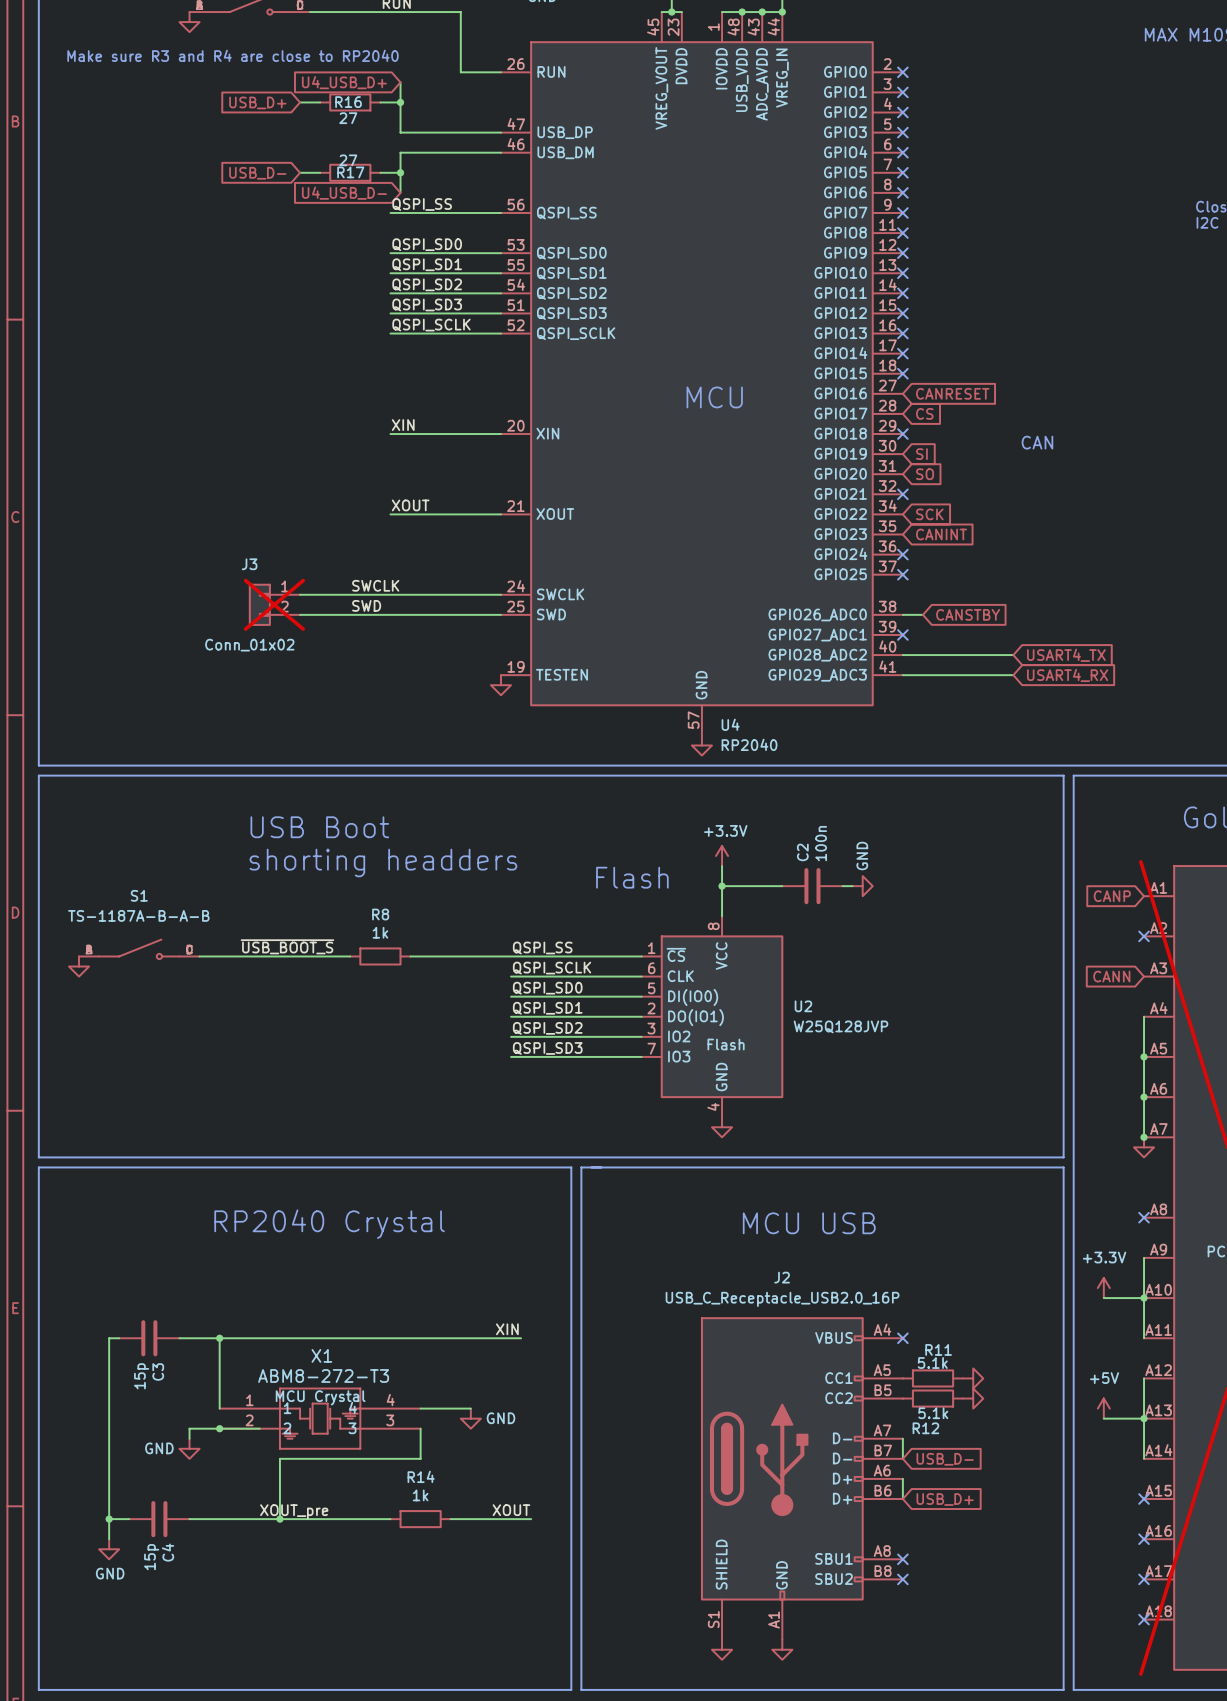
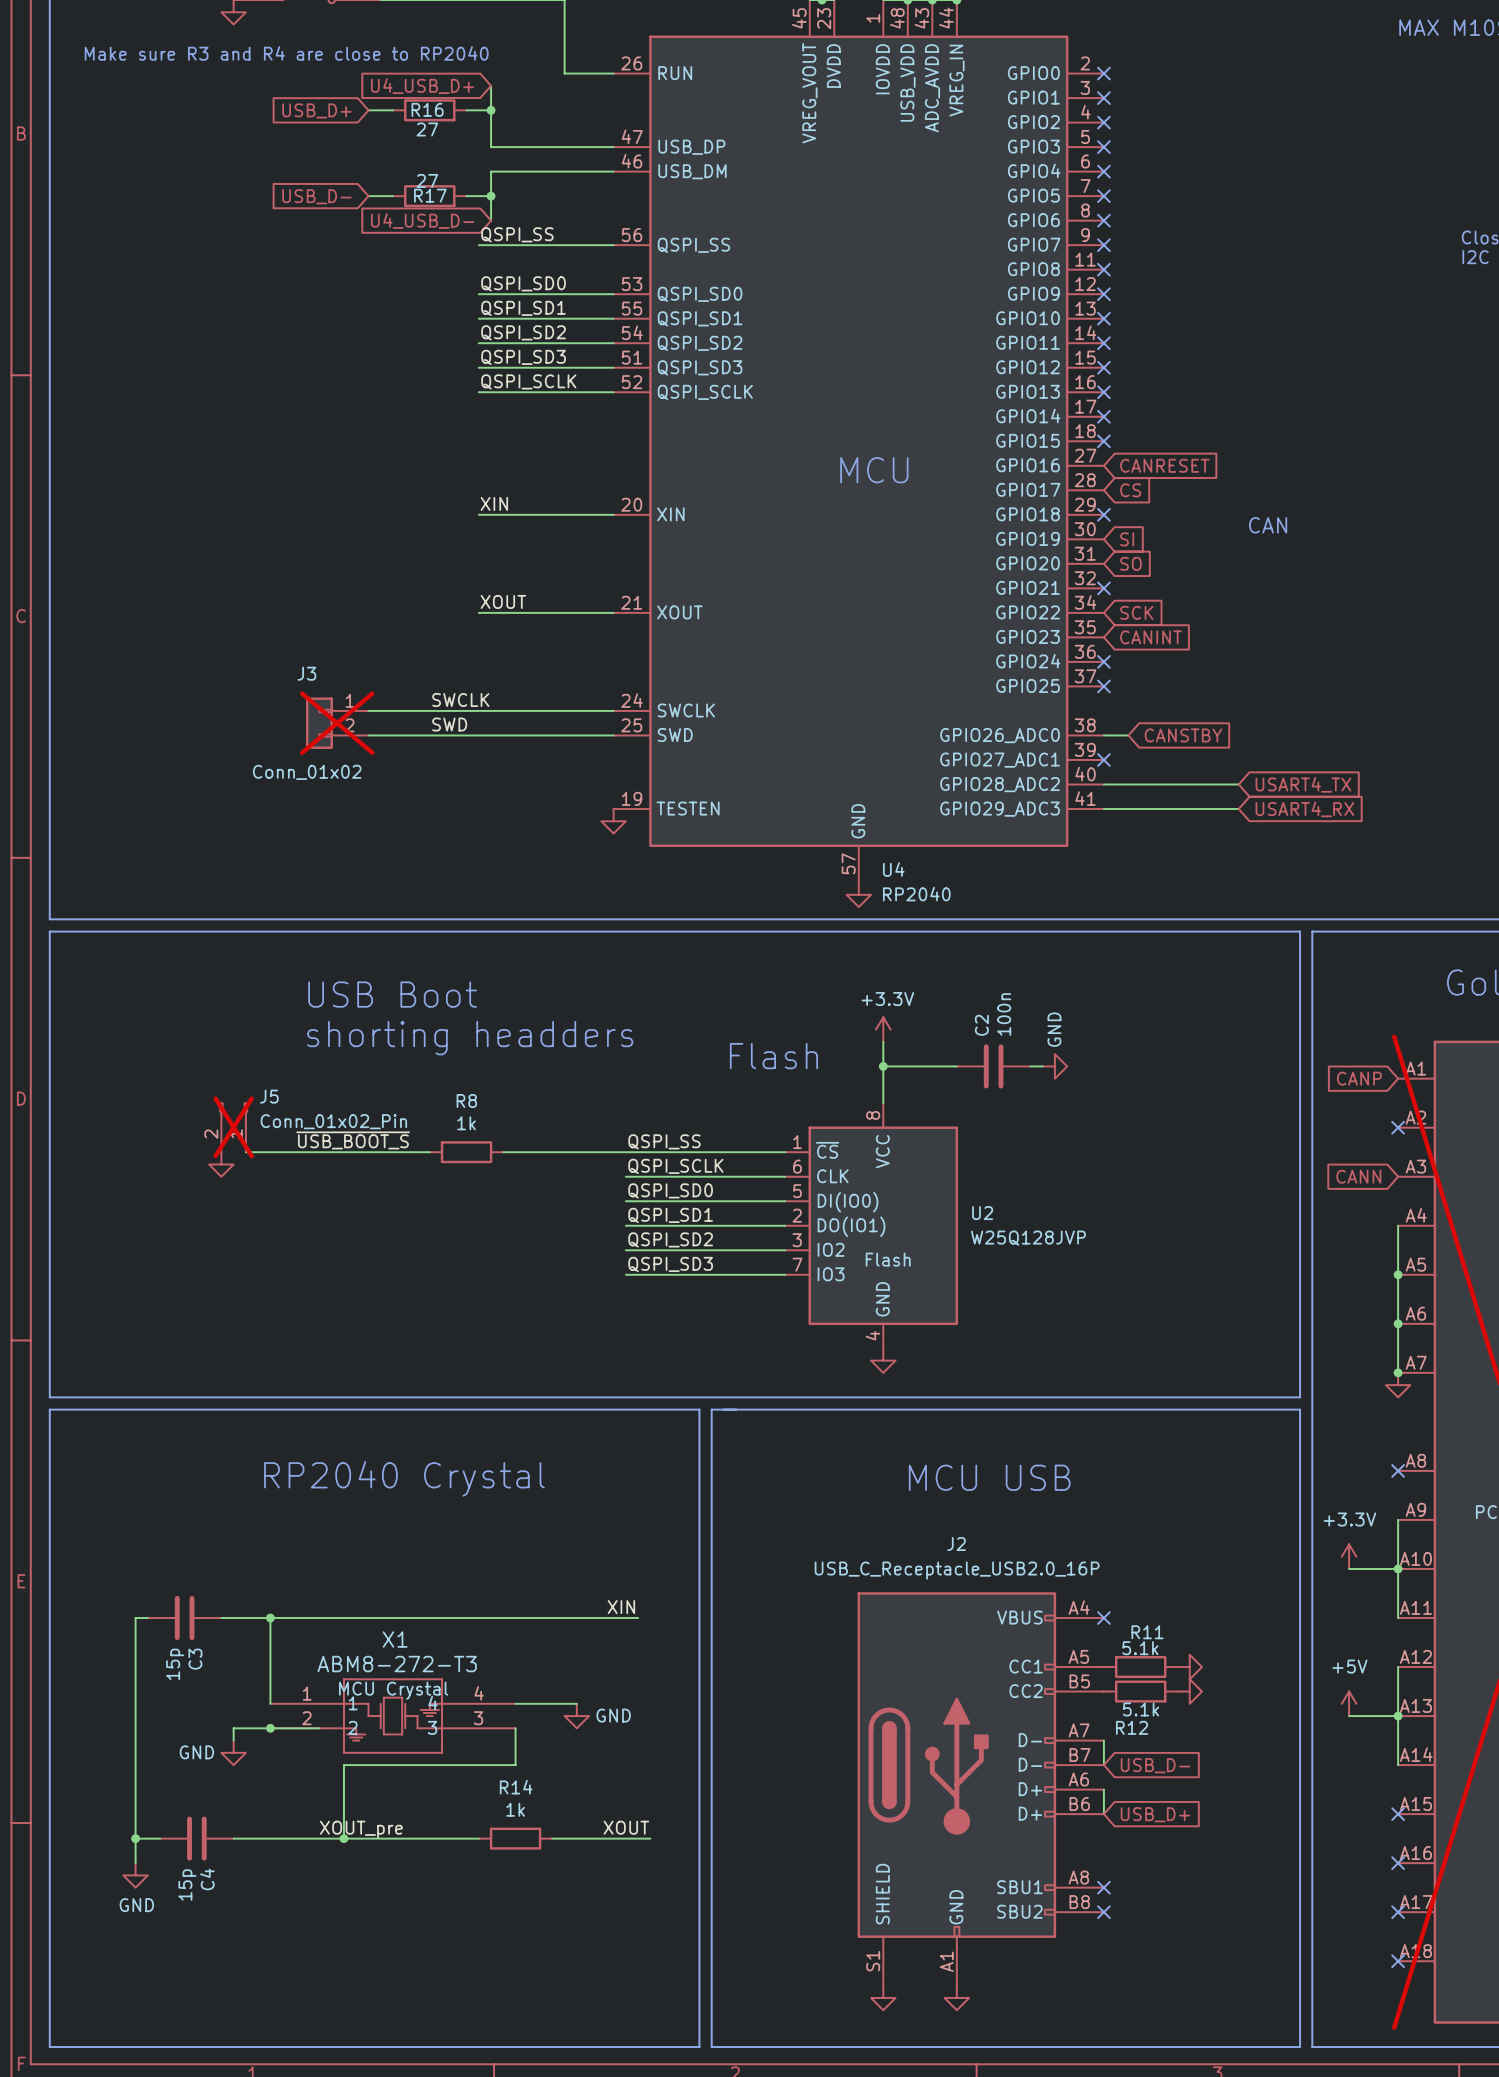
J5: none -> Conn_01x02_Pin (233, 1127)
S1: TS-1187A-B-A-B (139, 949) -> none
power symbol position: (79, 966) -> (221, 1164)

